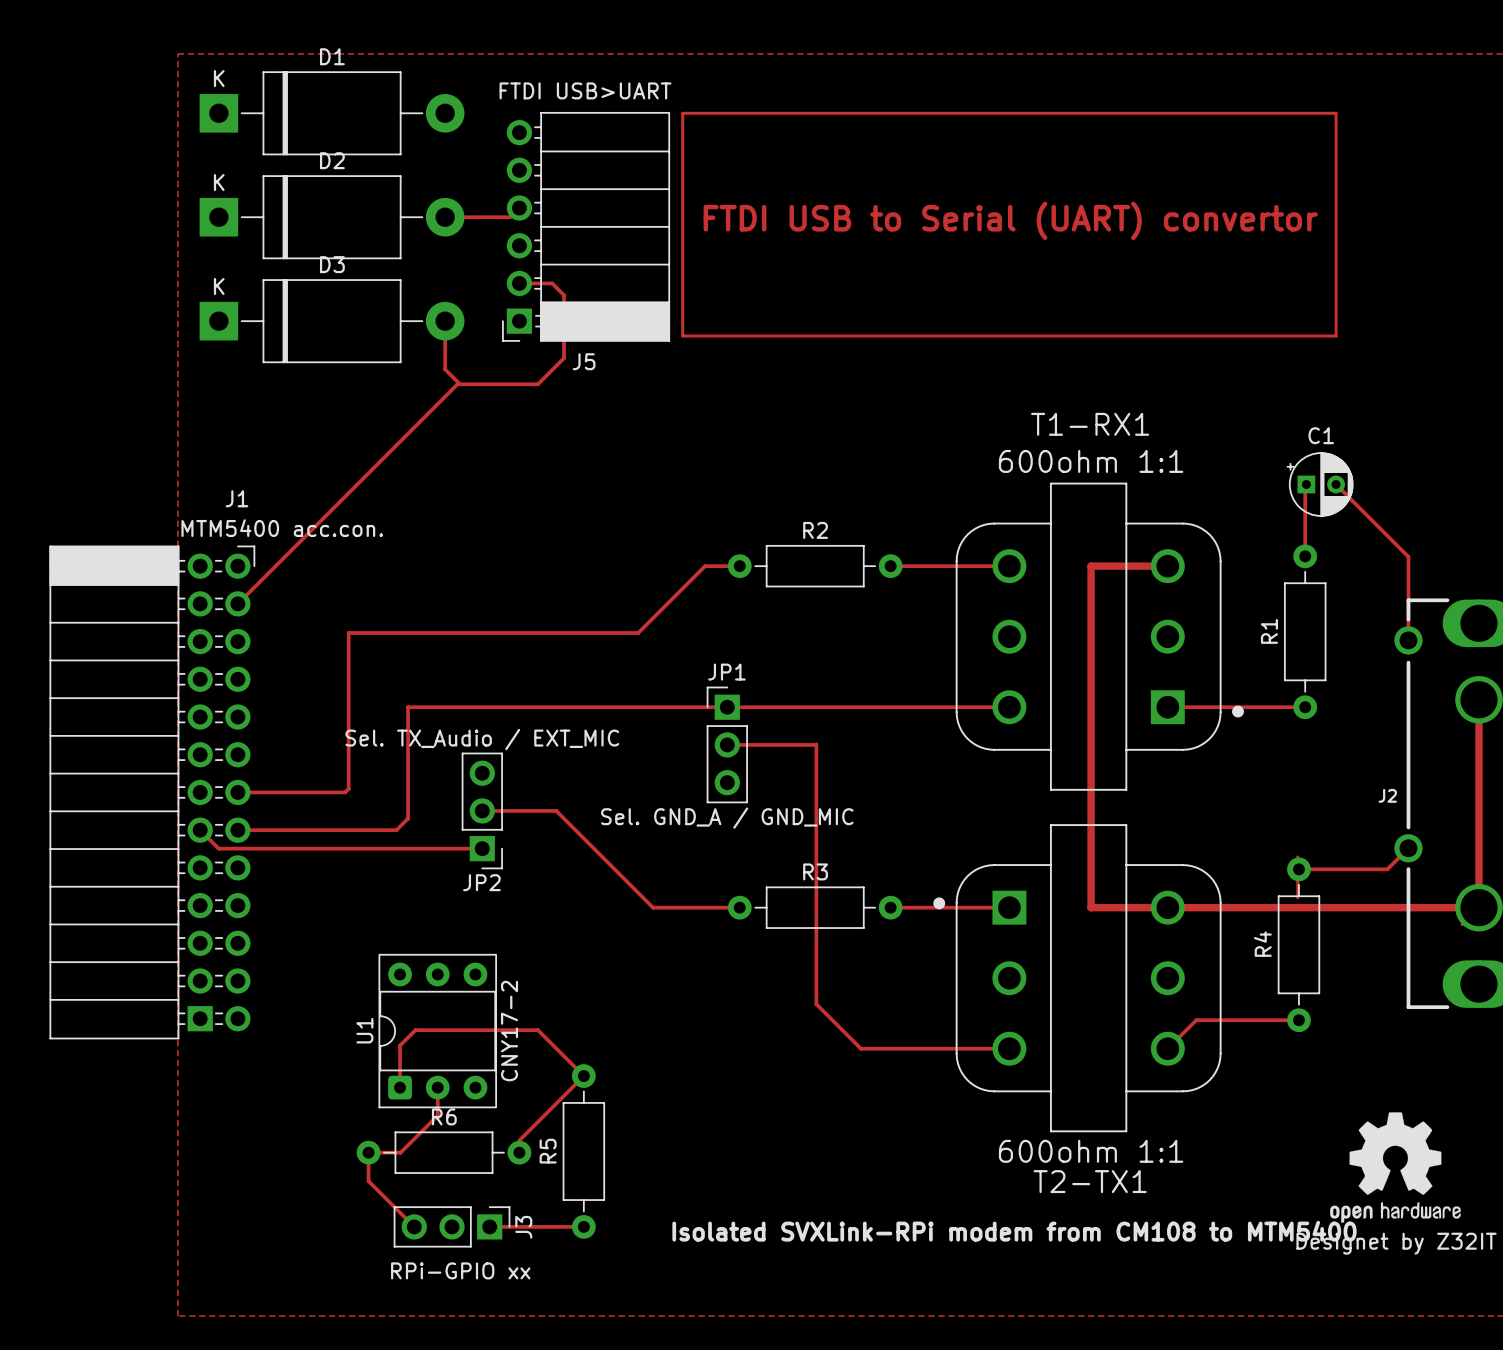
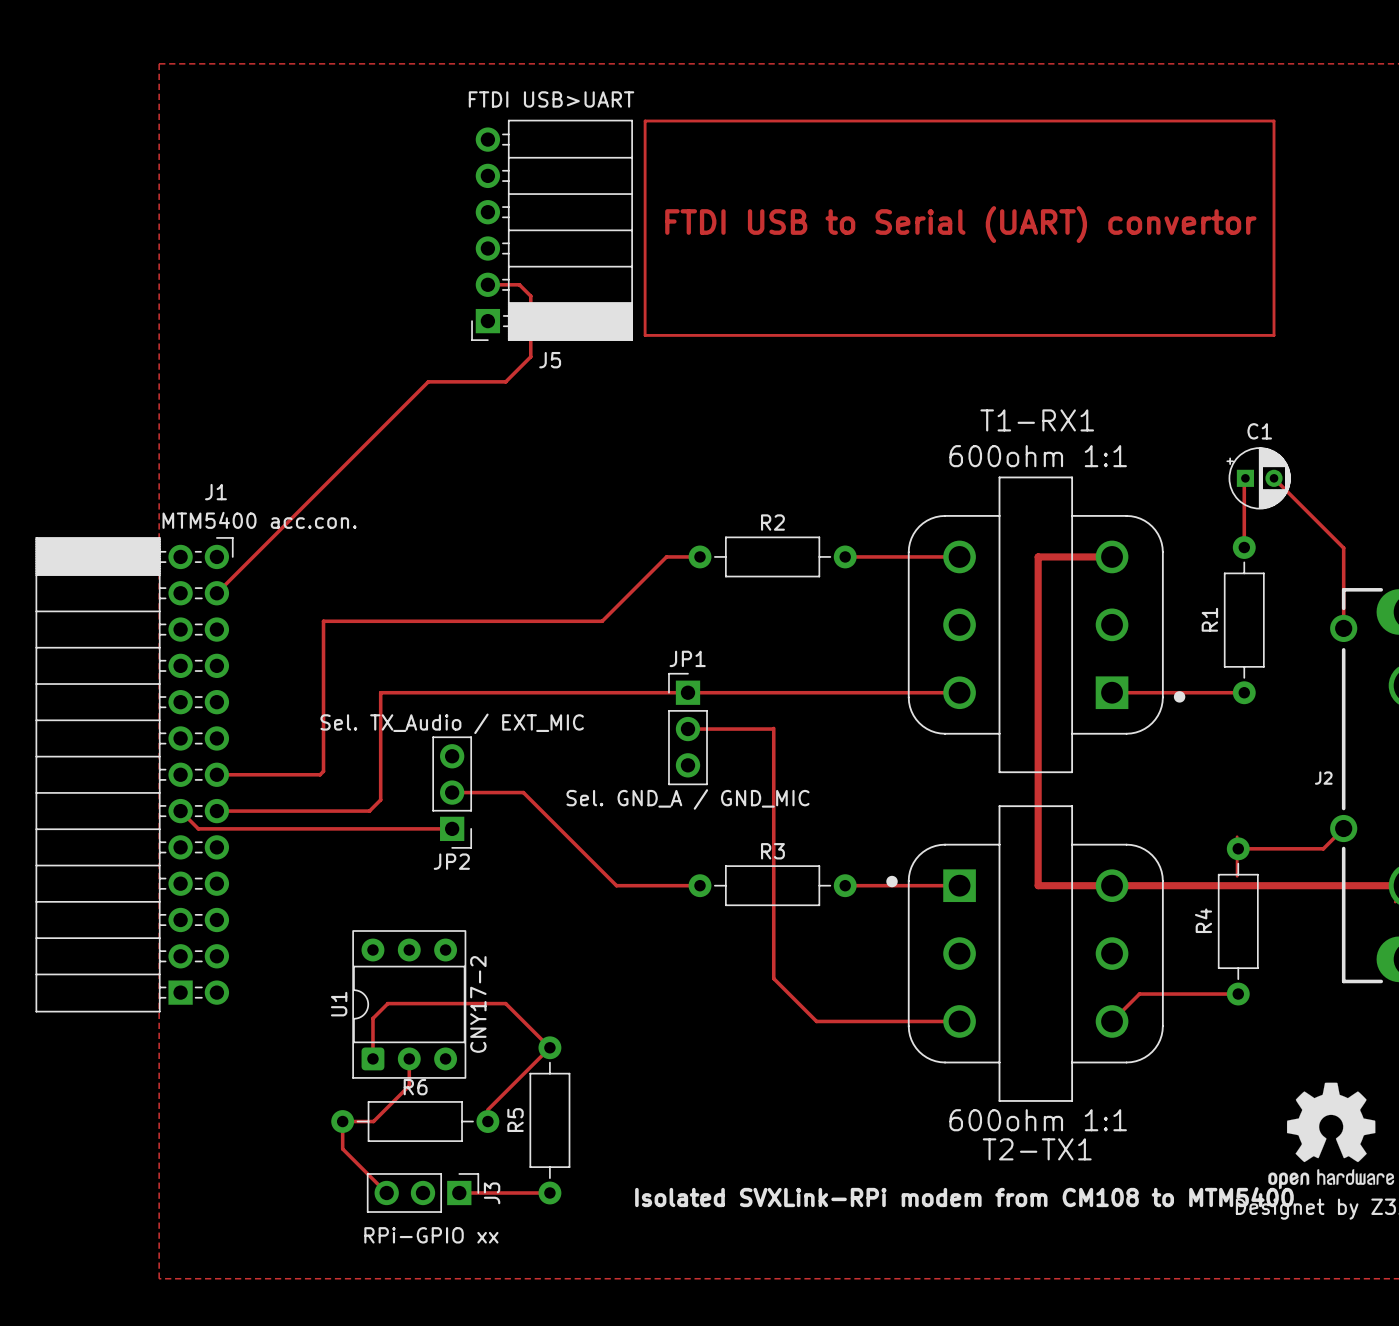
D1: (332, 113) -> none
track: (519, 208) (510, 217) (445, 217) -> none
D2: (332, 217) -> none
D3: (332, 321) -> none
track: (445, 321) (445, 369) (460, 384) -> none

